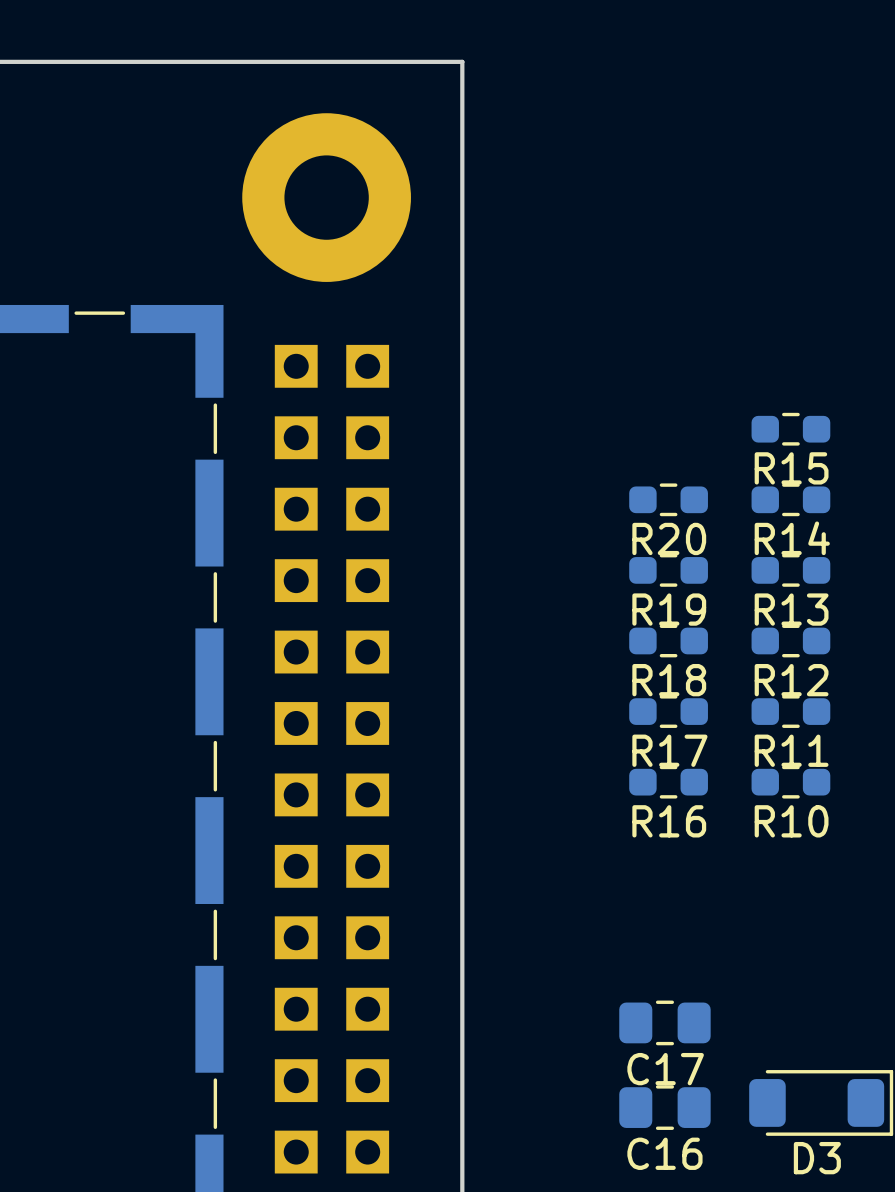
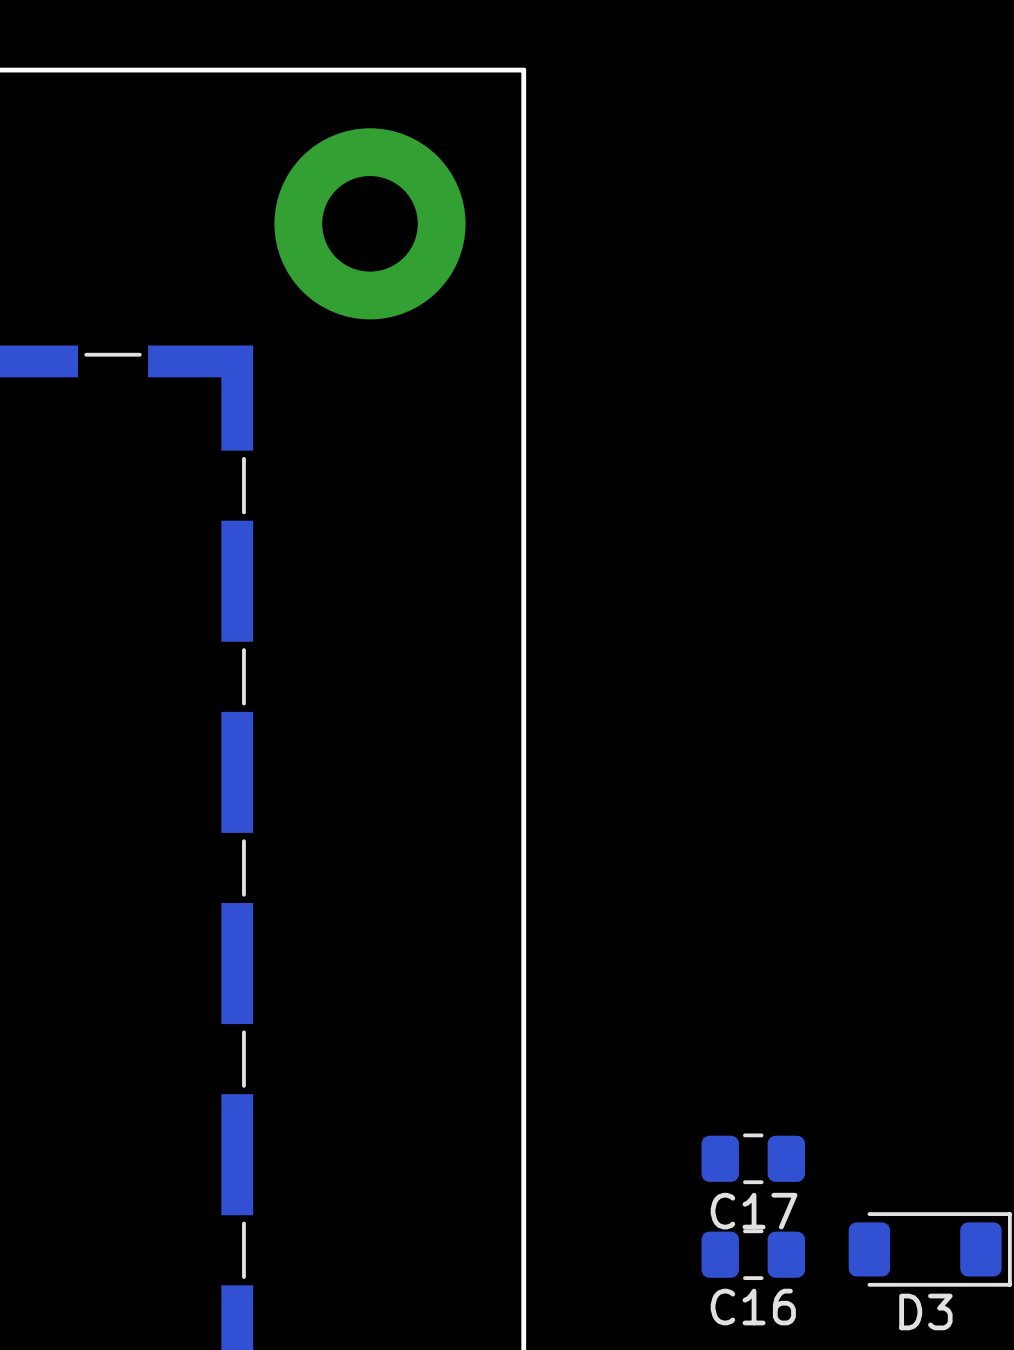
R15: (790, 429) -> none
R20: (668, 499) -> none
R14: (790, 499) -> none
R19: (668, 570) -> none
R13: (790, 570) -> none
R18: (668, 640) -> none
R12: (790, 640) -> none
R17: (668, 711) -> none
R11: (790, 711) -> none
part: (331, 759) -> none
R16: (668, 782) -> none
R10: (790, 782) -> none

